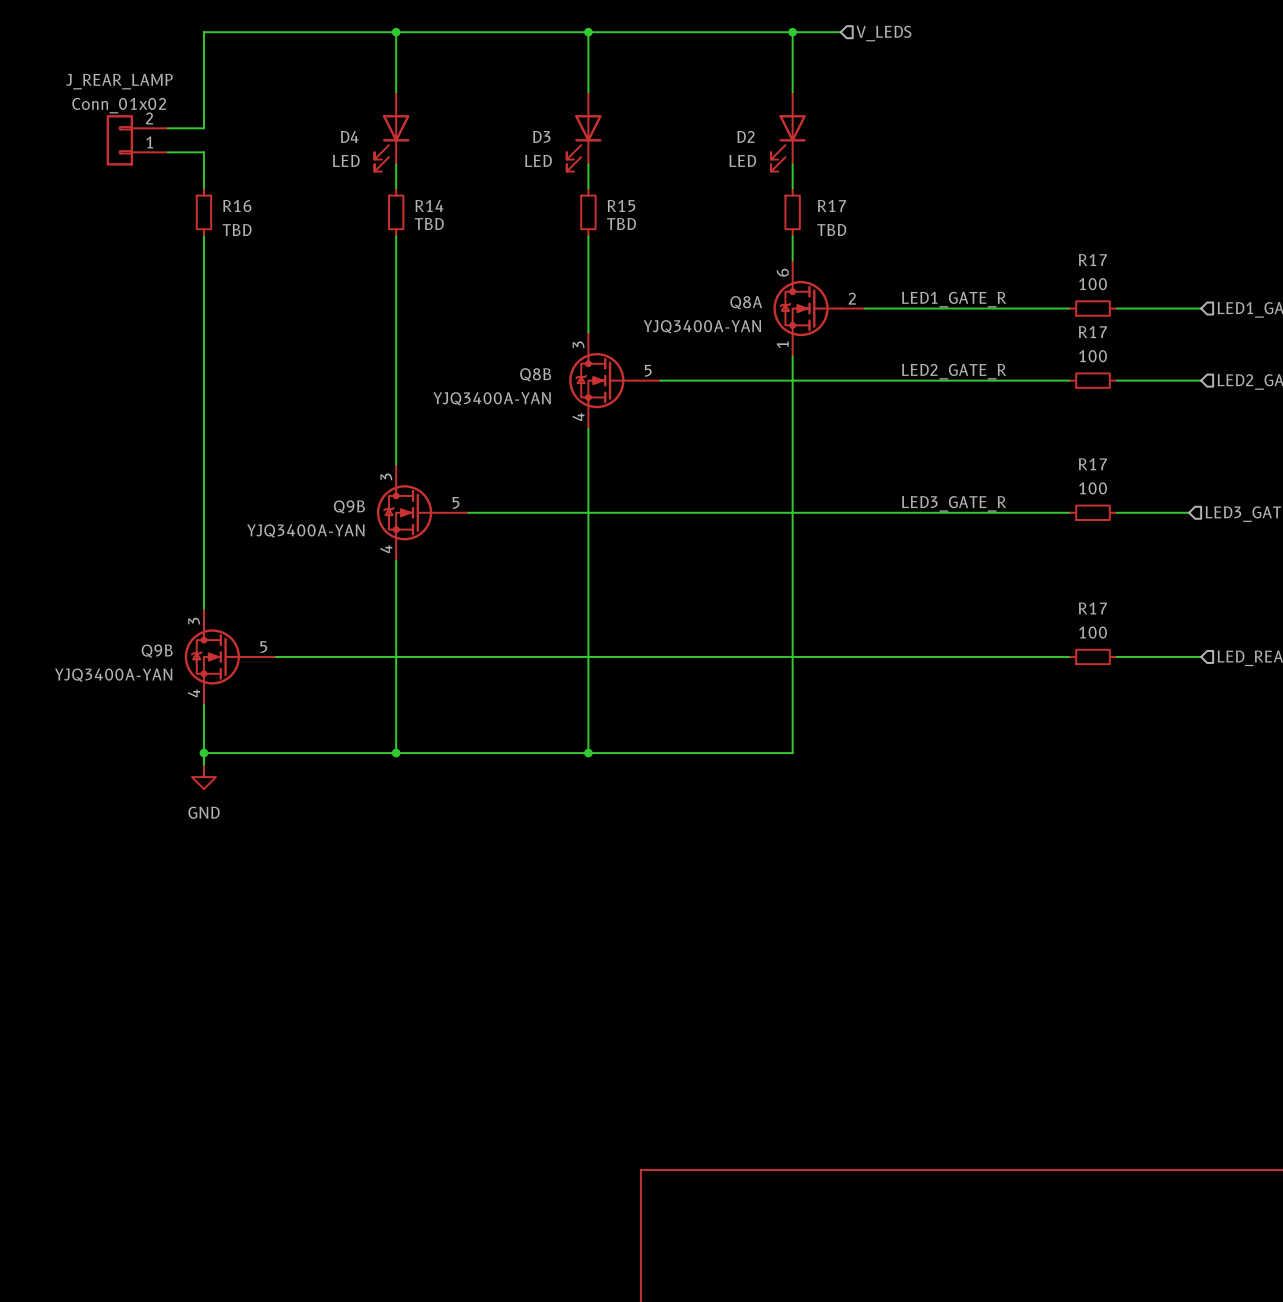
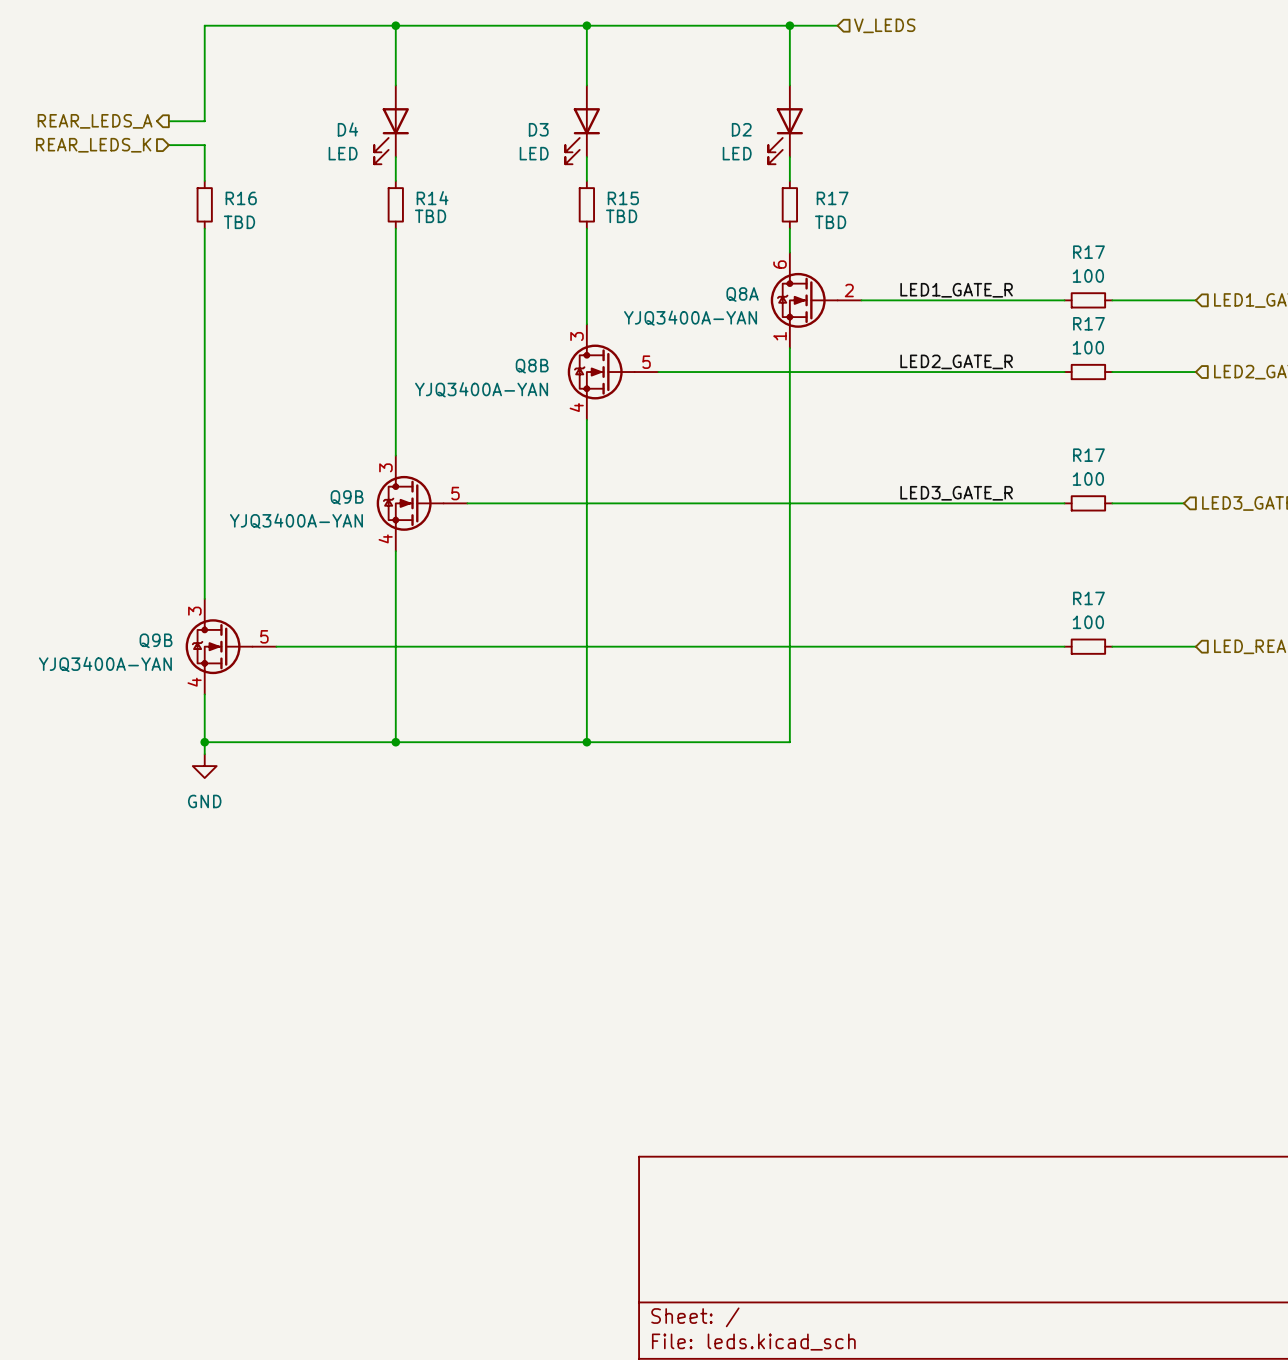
hierarchical label: none -> REAR_LEDS_A (95, 121)
J_REAR_LAMP: Conn_01x02 (137, 140) -> none
hierarchical label: none -> REAR_LEDS_K (93, 145)

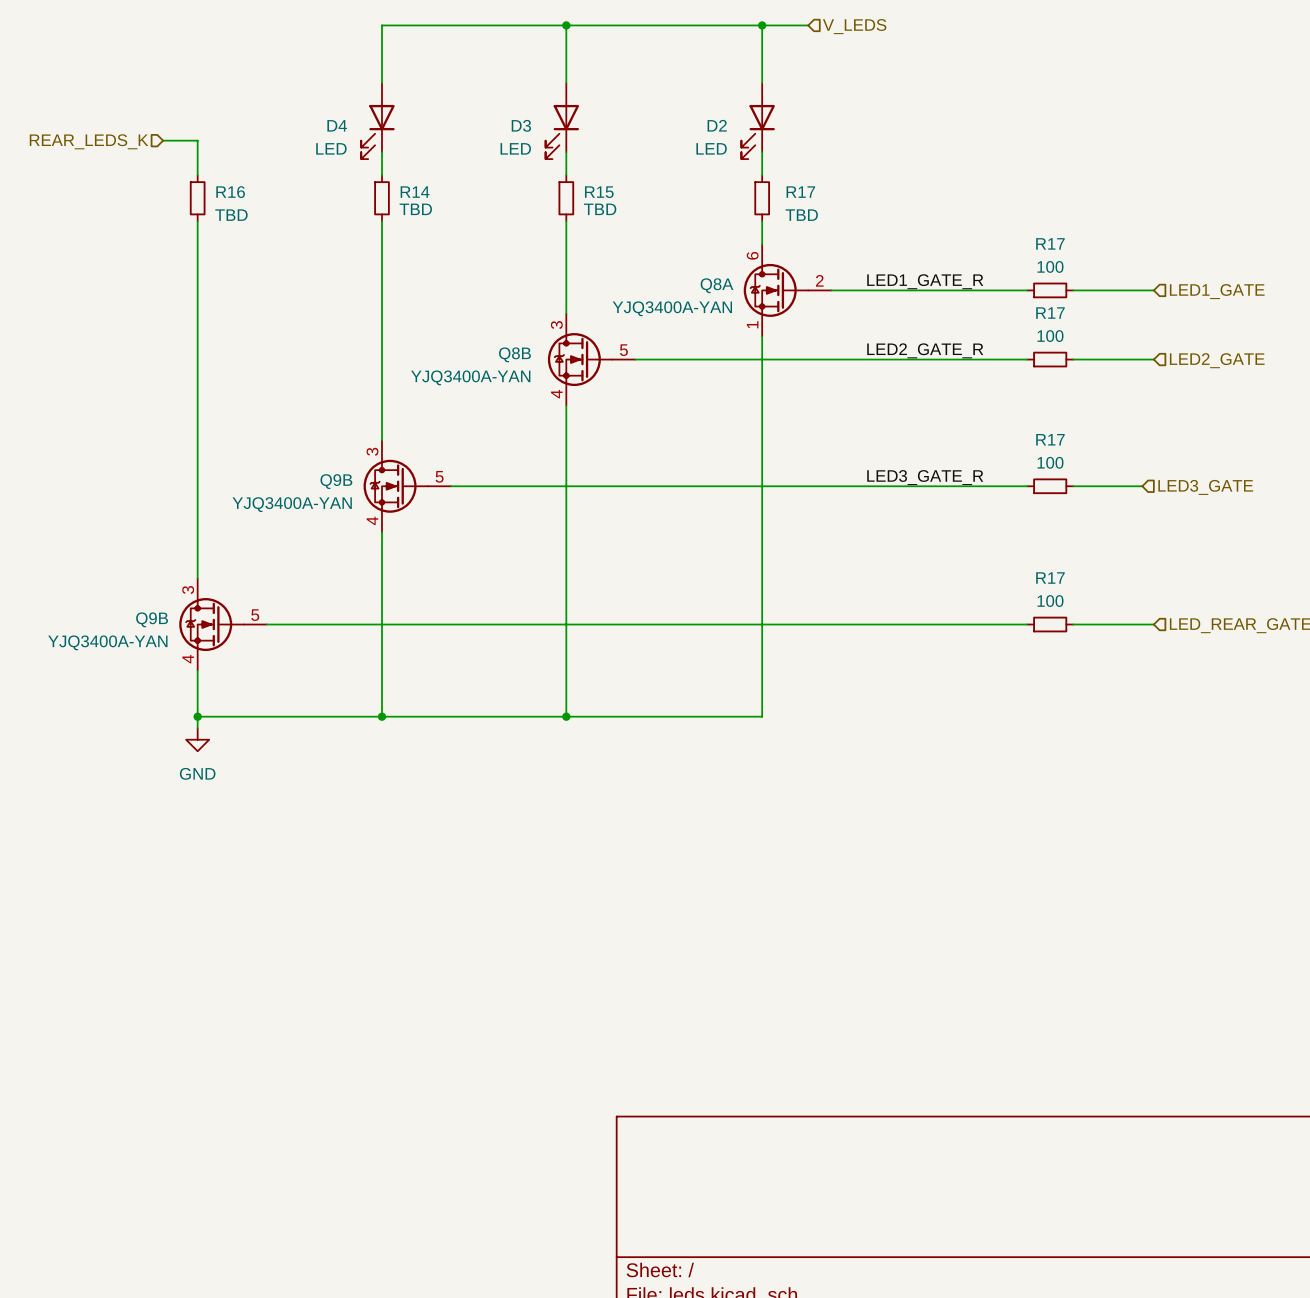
wire: (395, 25) (204, 25) (204, 121) (168, 121) -> none
junction: (395, 25) -> none
hierarchical label: REAR_LEDS_A (95, 121) -> none

